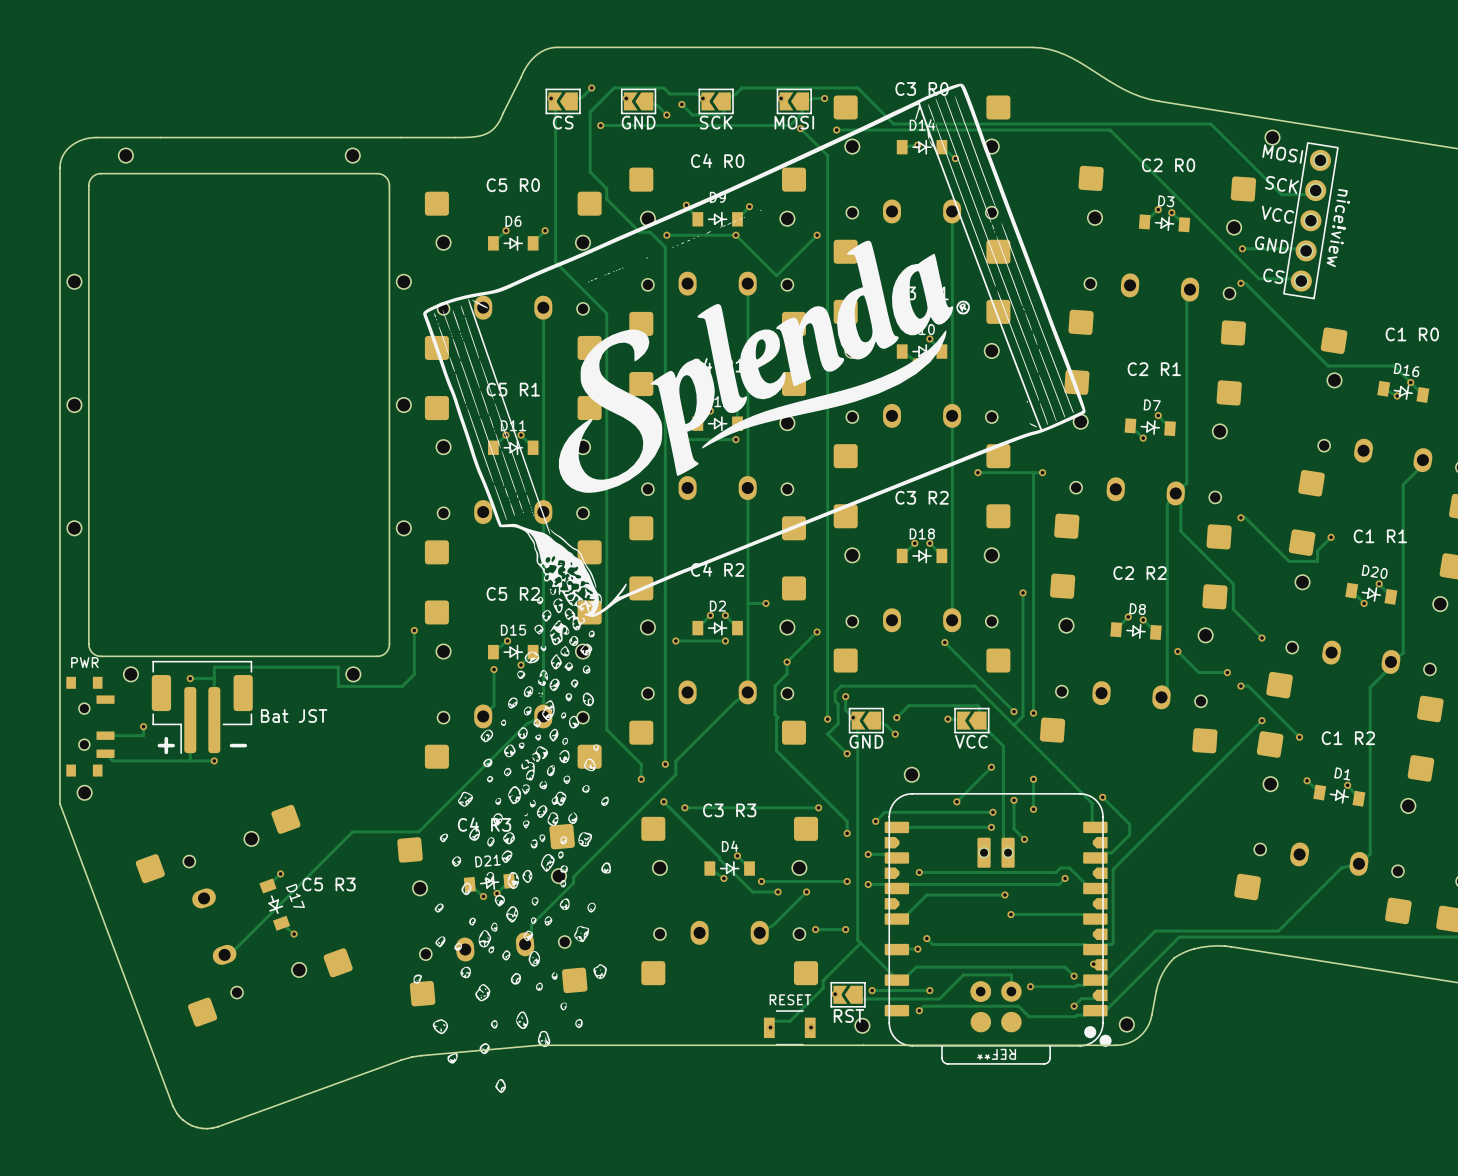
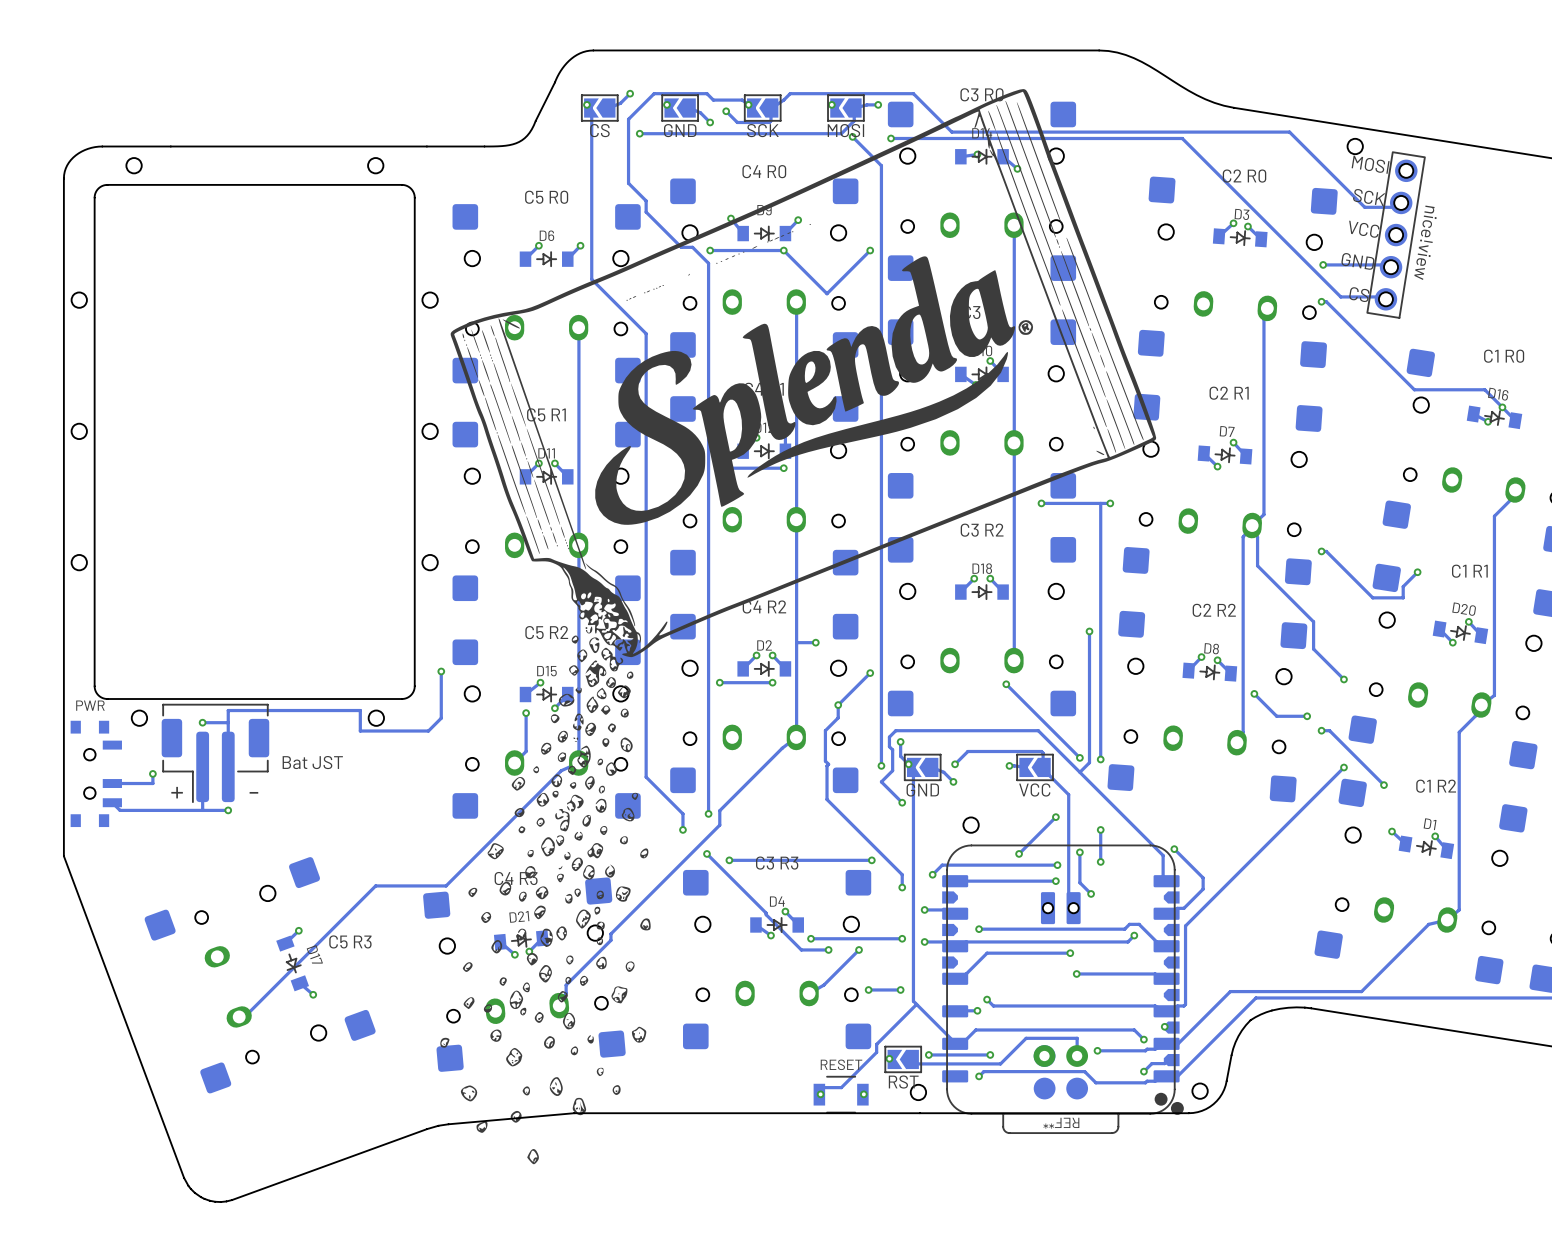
part: (84, 792) -> none

